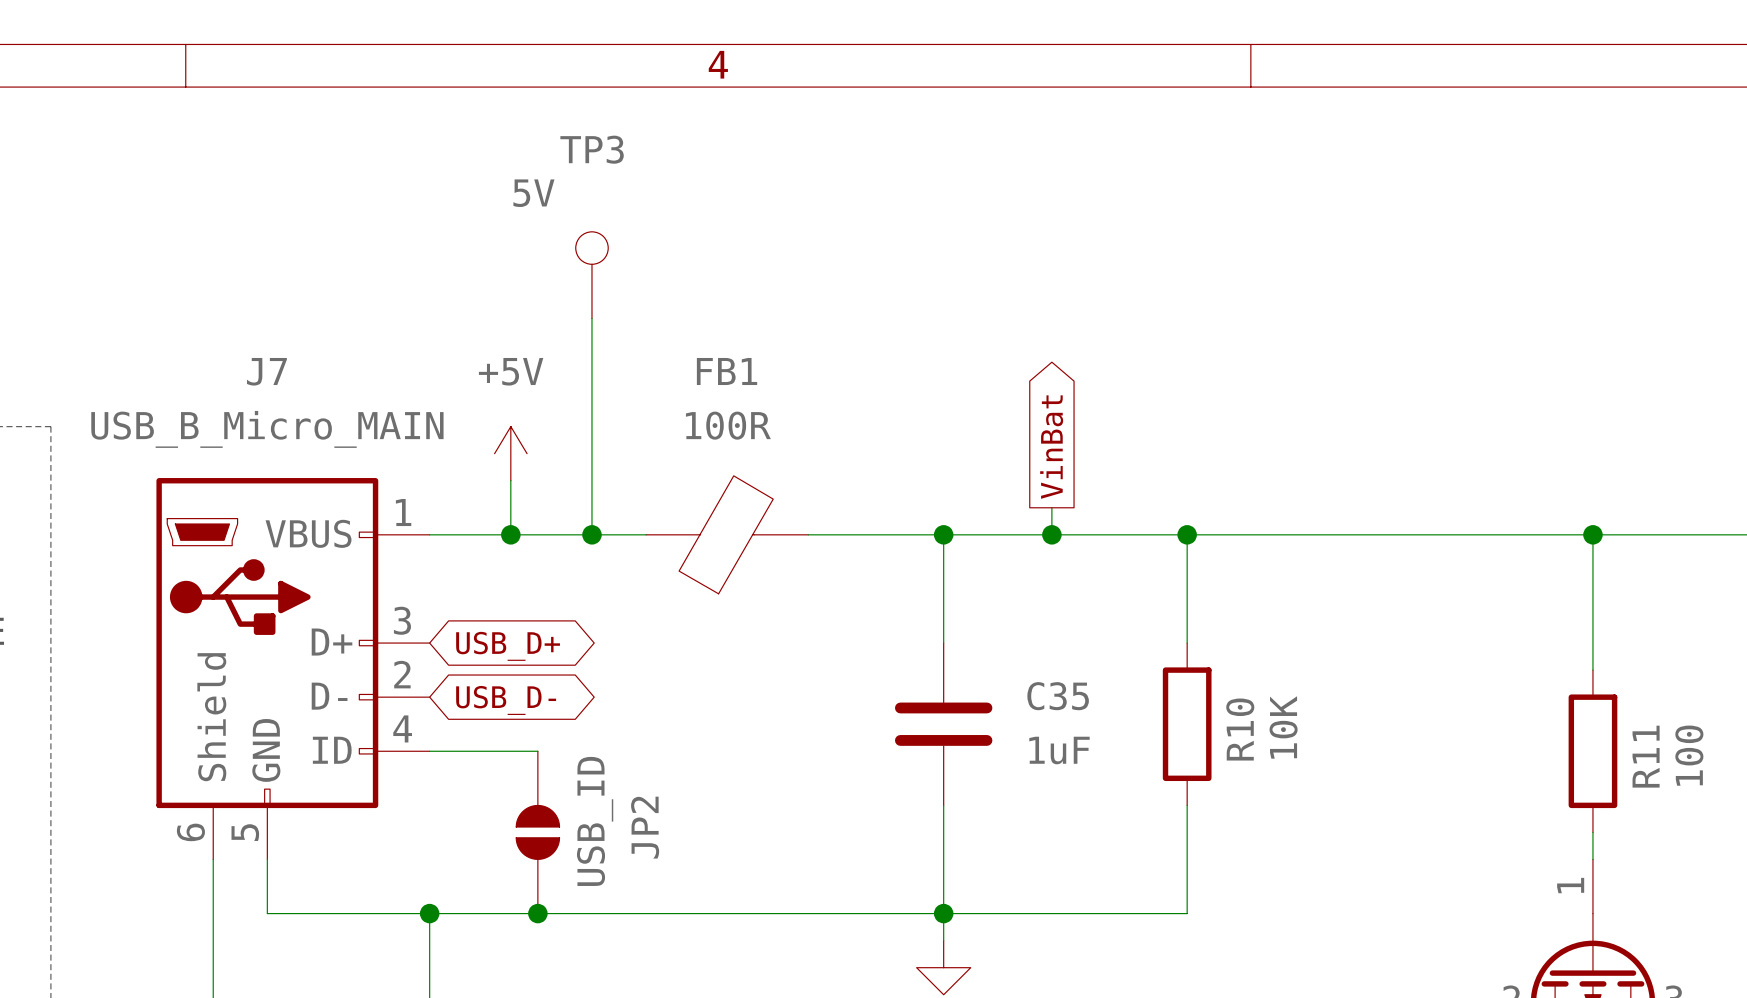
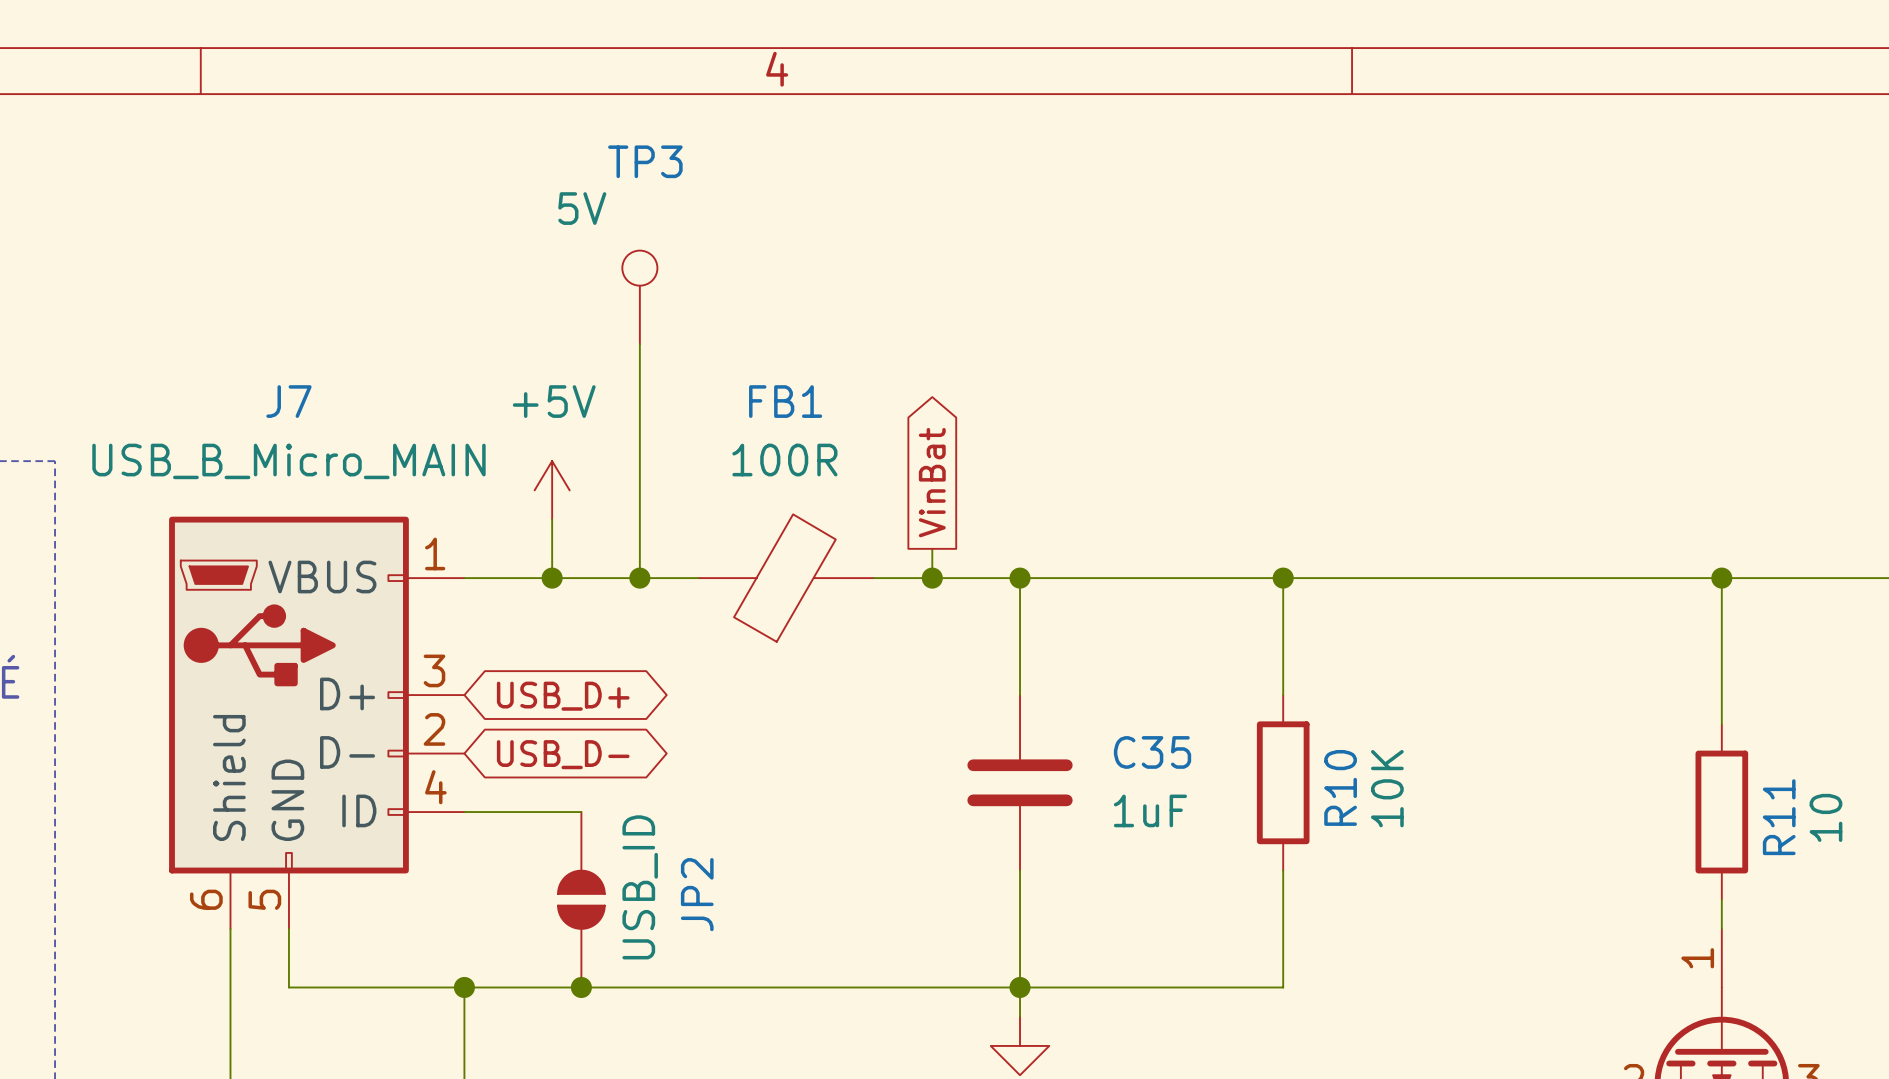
global label position: VinBat (1051, 447) -> VinBat (932, 482)
wire: (1051, 507) (1051, 534) -> (932, 548) (932, 578)
junction: none -> (932, 578)
junction: (1051, 534) -> none
R11 value: 100 (1689, 755) -> 10 (1826, 817)

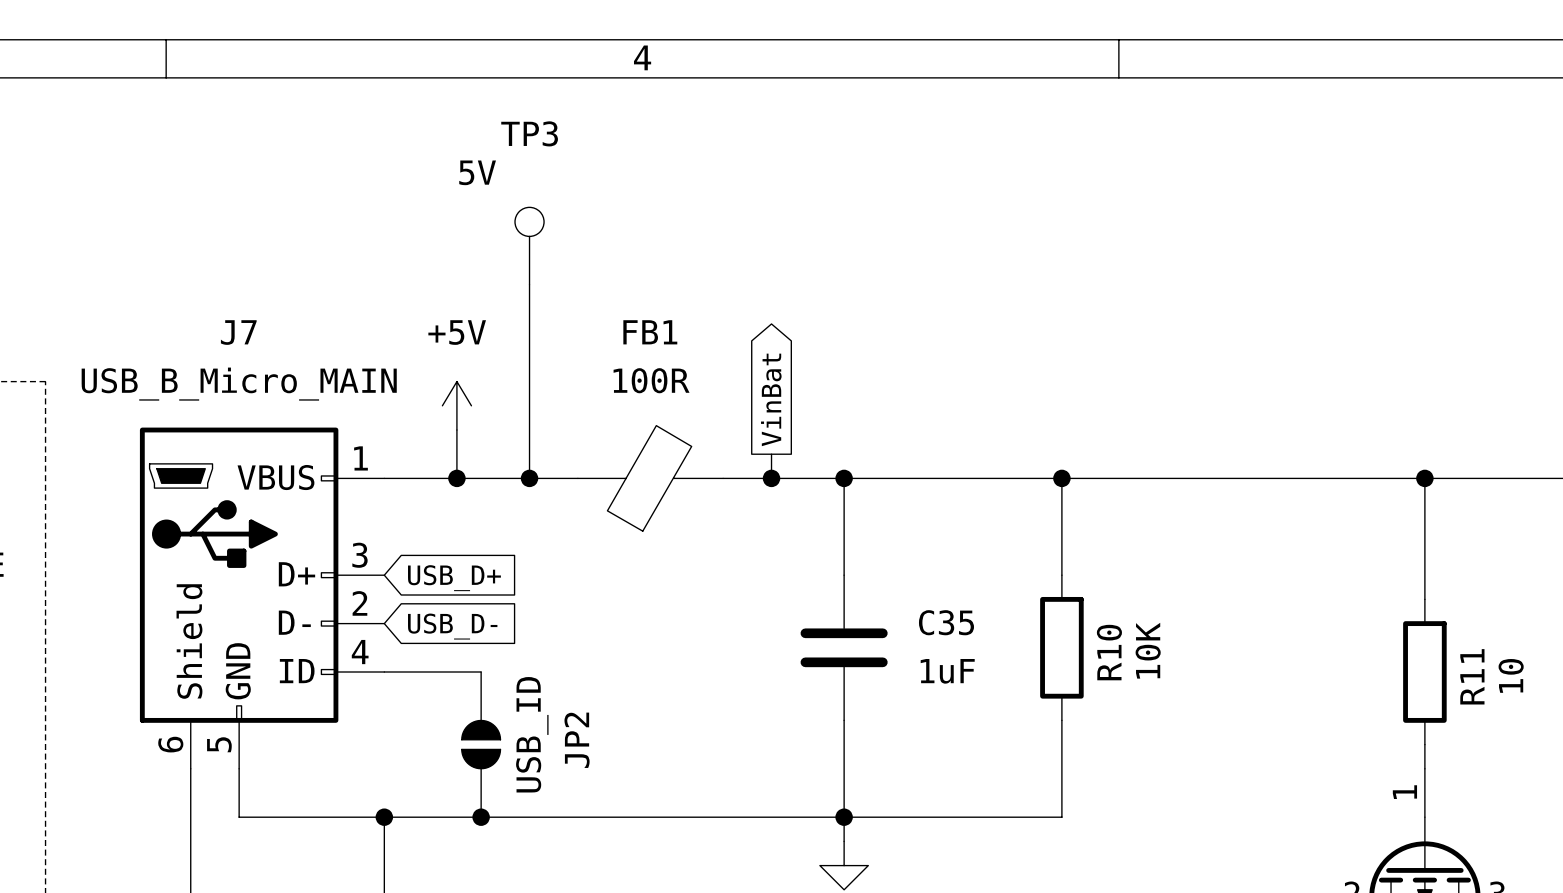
global label shape: bidirectional (563, 696) -> input (454, 578)
global label shape: bidirectional (563, 754) -> input (452, 626)

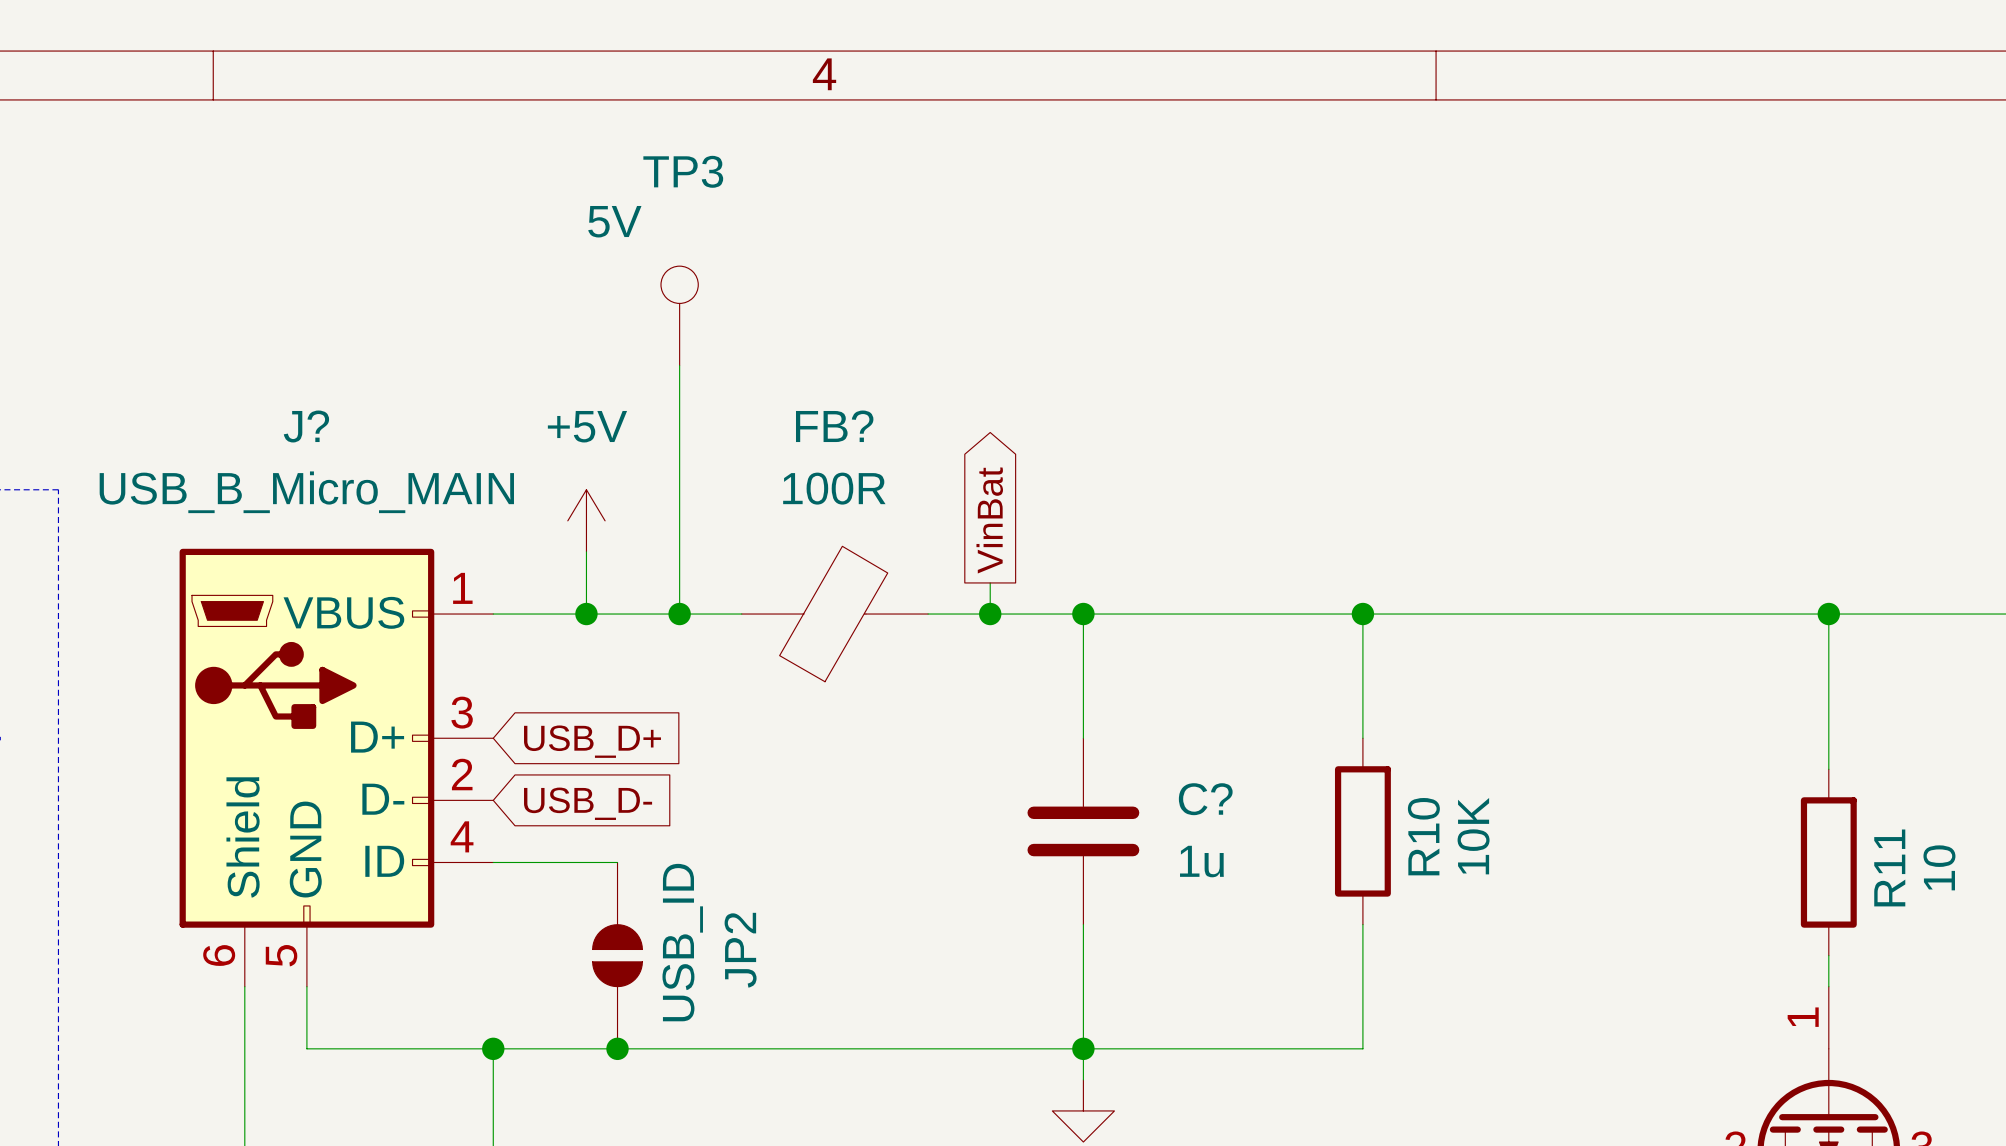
J7 name: J7 (238, 332) -> J? (306, 426)
FB1 name: FB1 (650, 332) -> FB? (834, 426)
C35 name: C35 (946, 622) -> C? (1205, 799)
C35 value: 1uF (947, 671) -> 1u (1201, 861)

